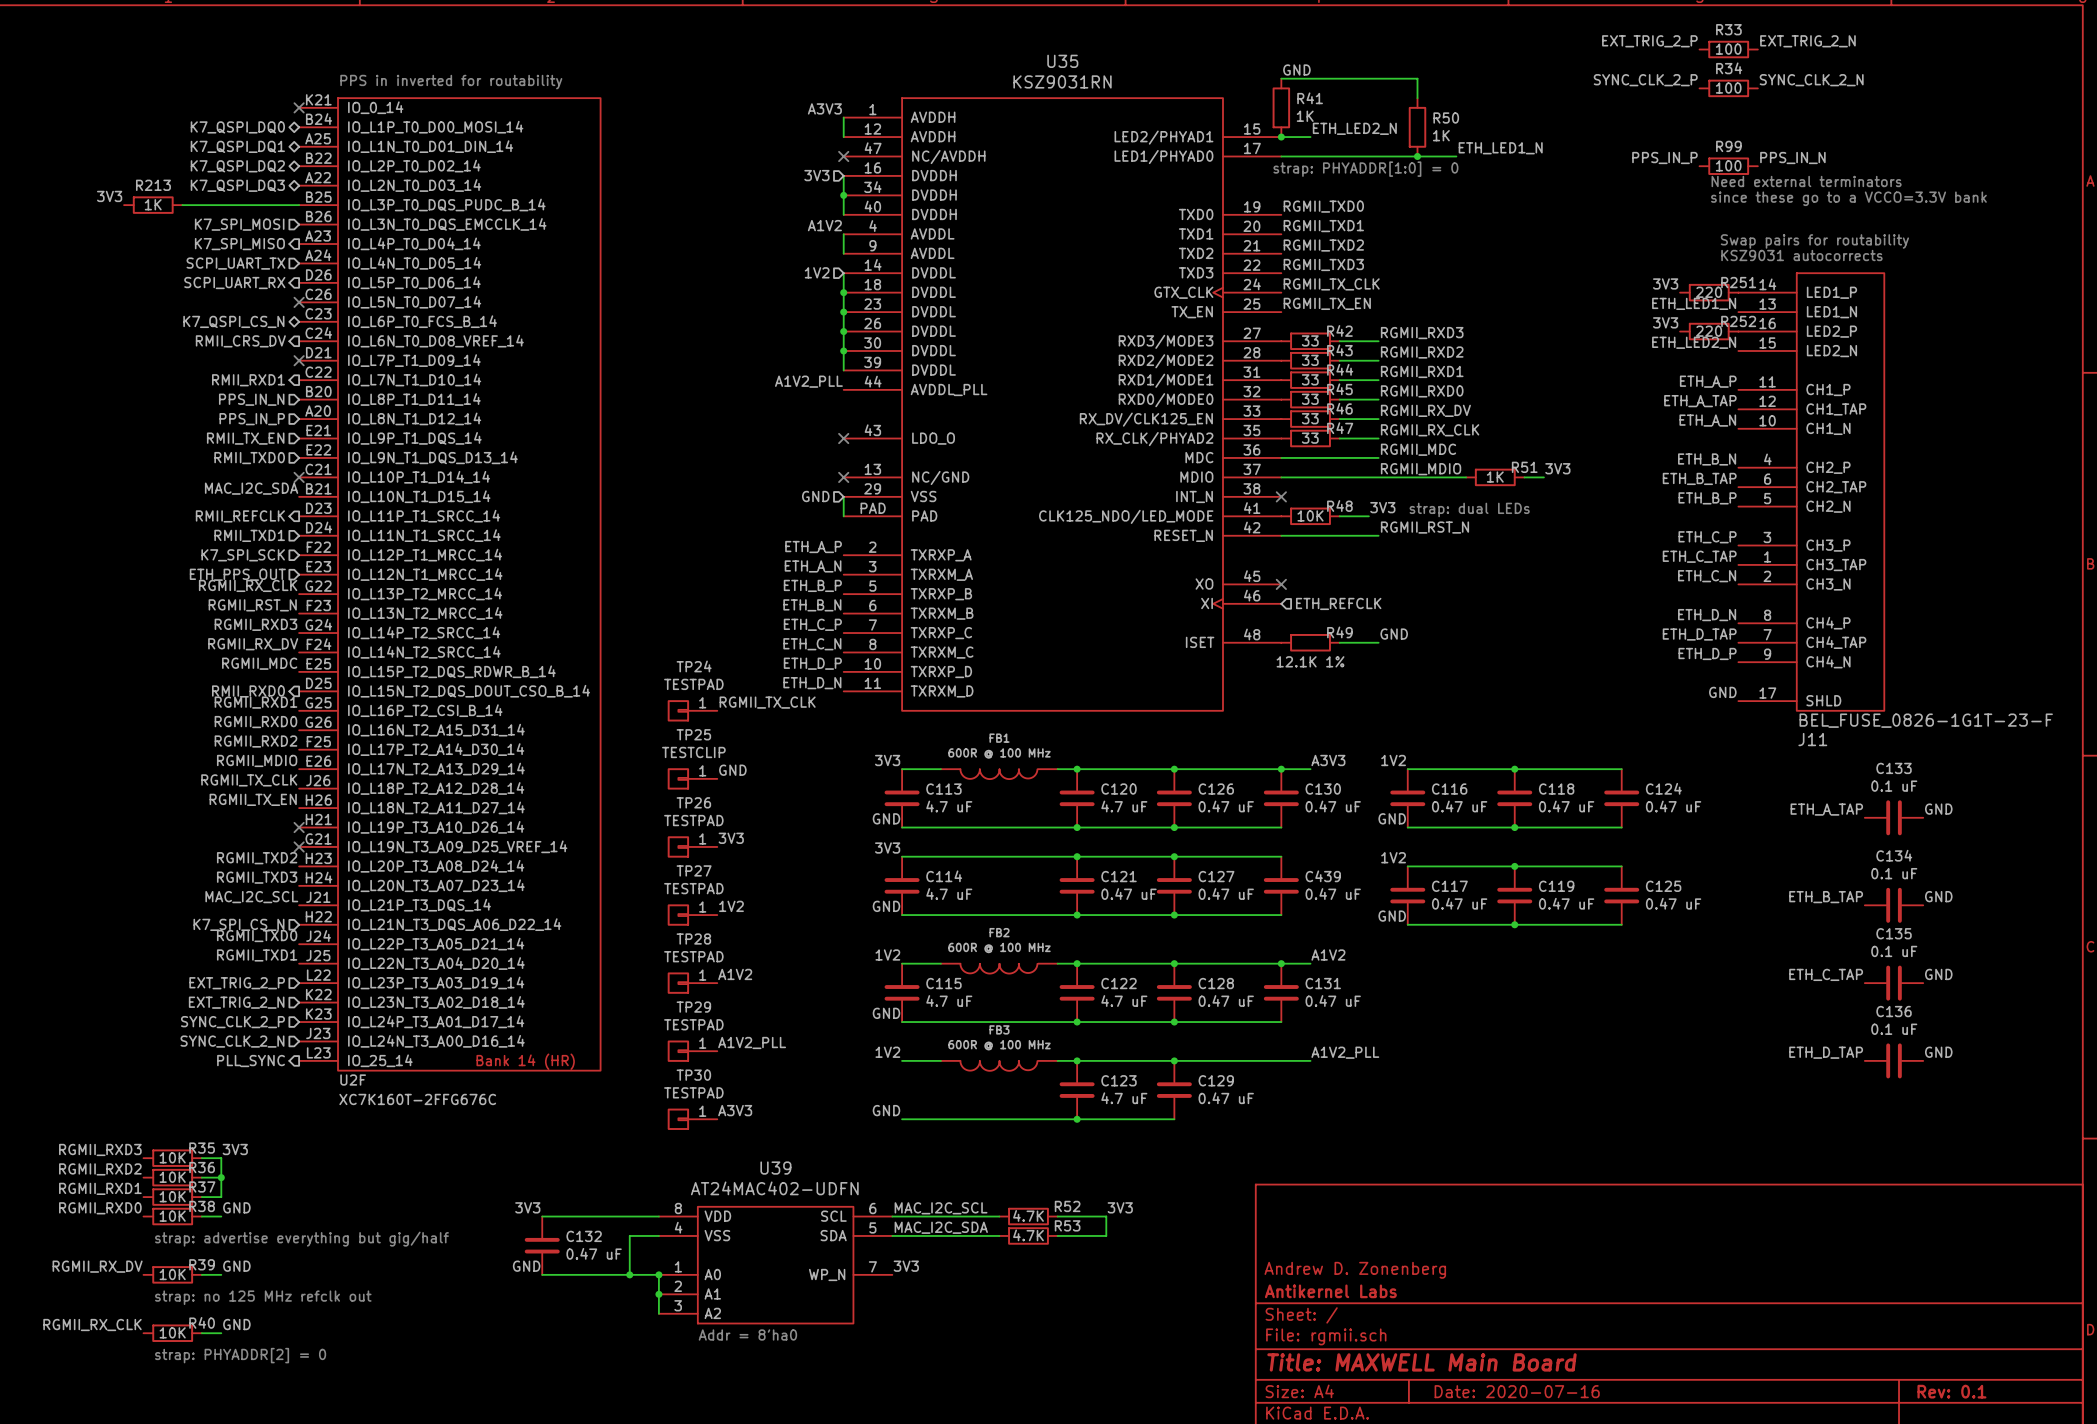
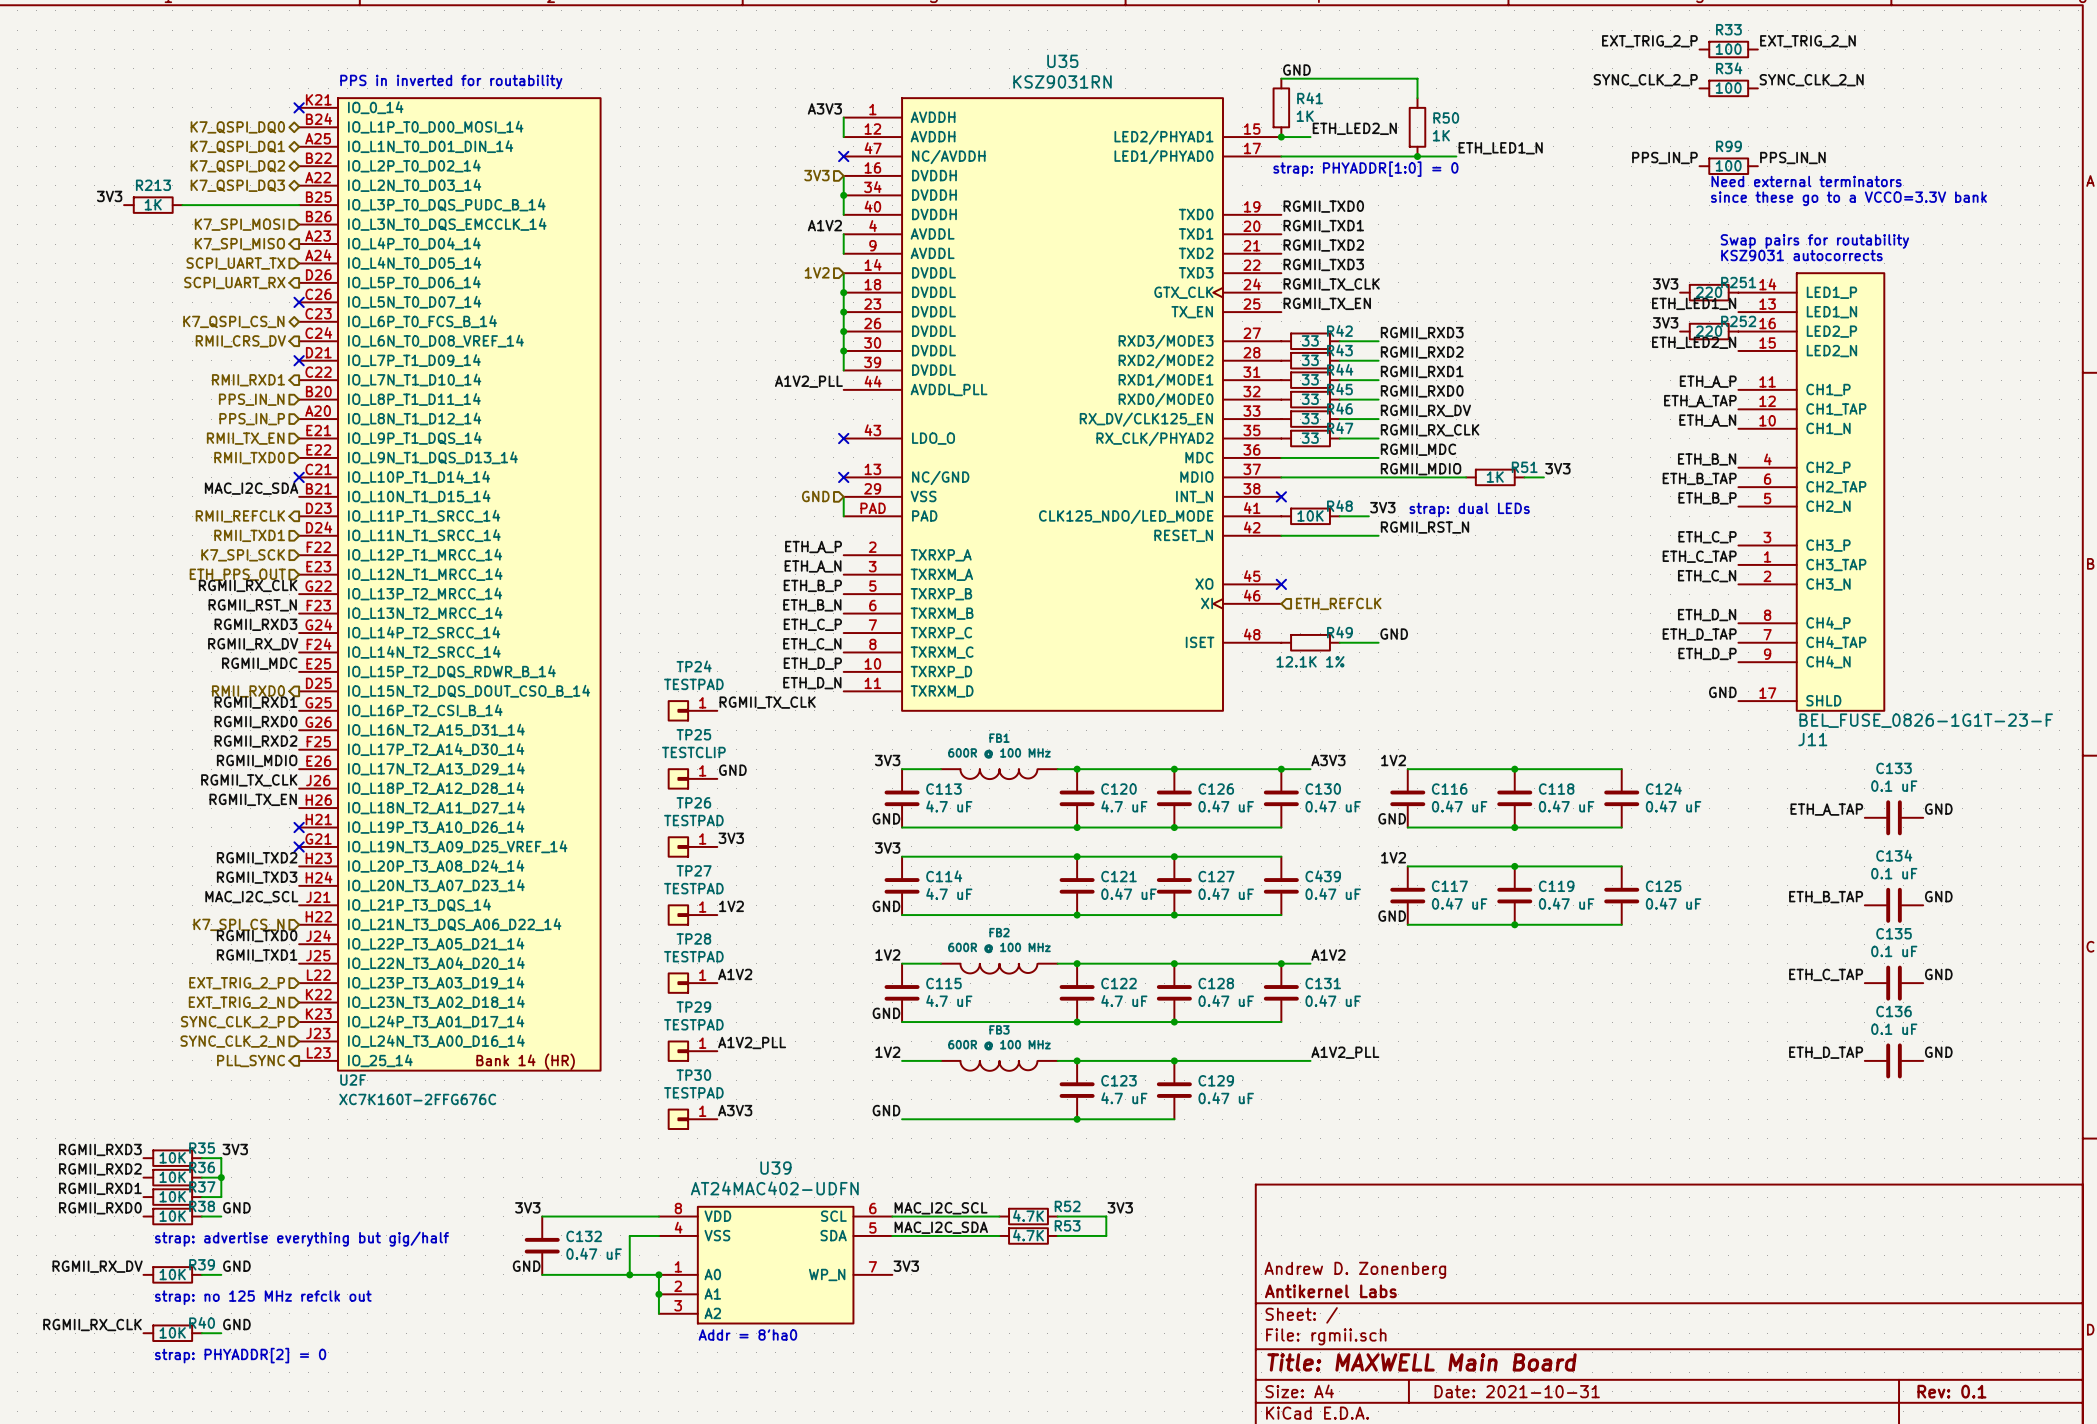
title block: Date: 2020-07-16 (1517, 1391) -> Date: 2021-10-31 (1517, 1391)

